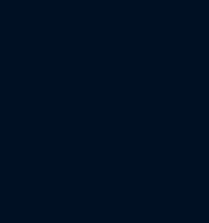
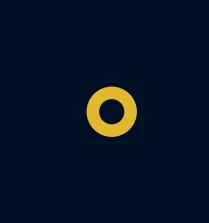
part: none -> (111, 111)

